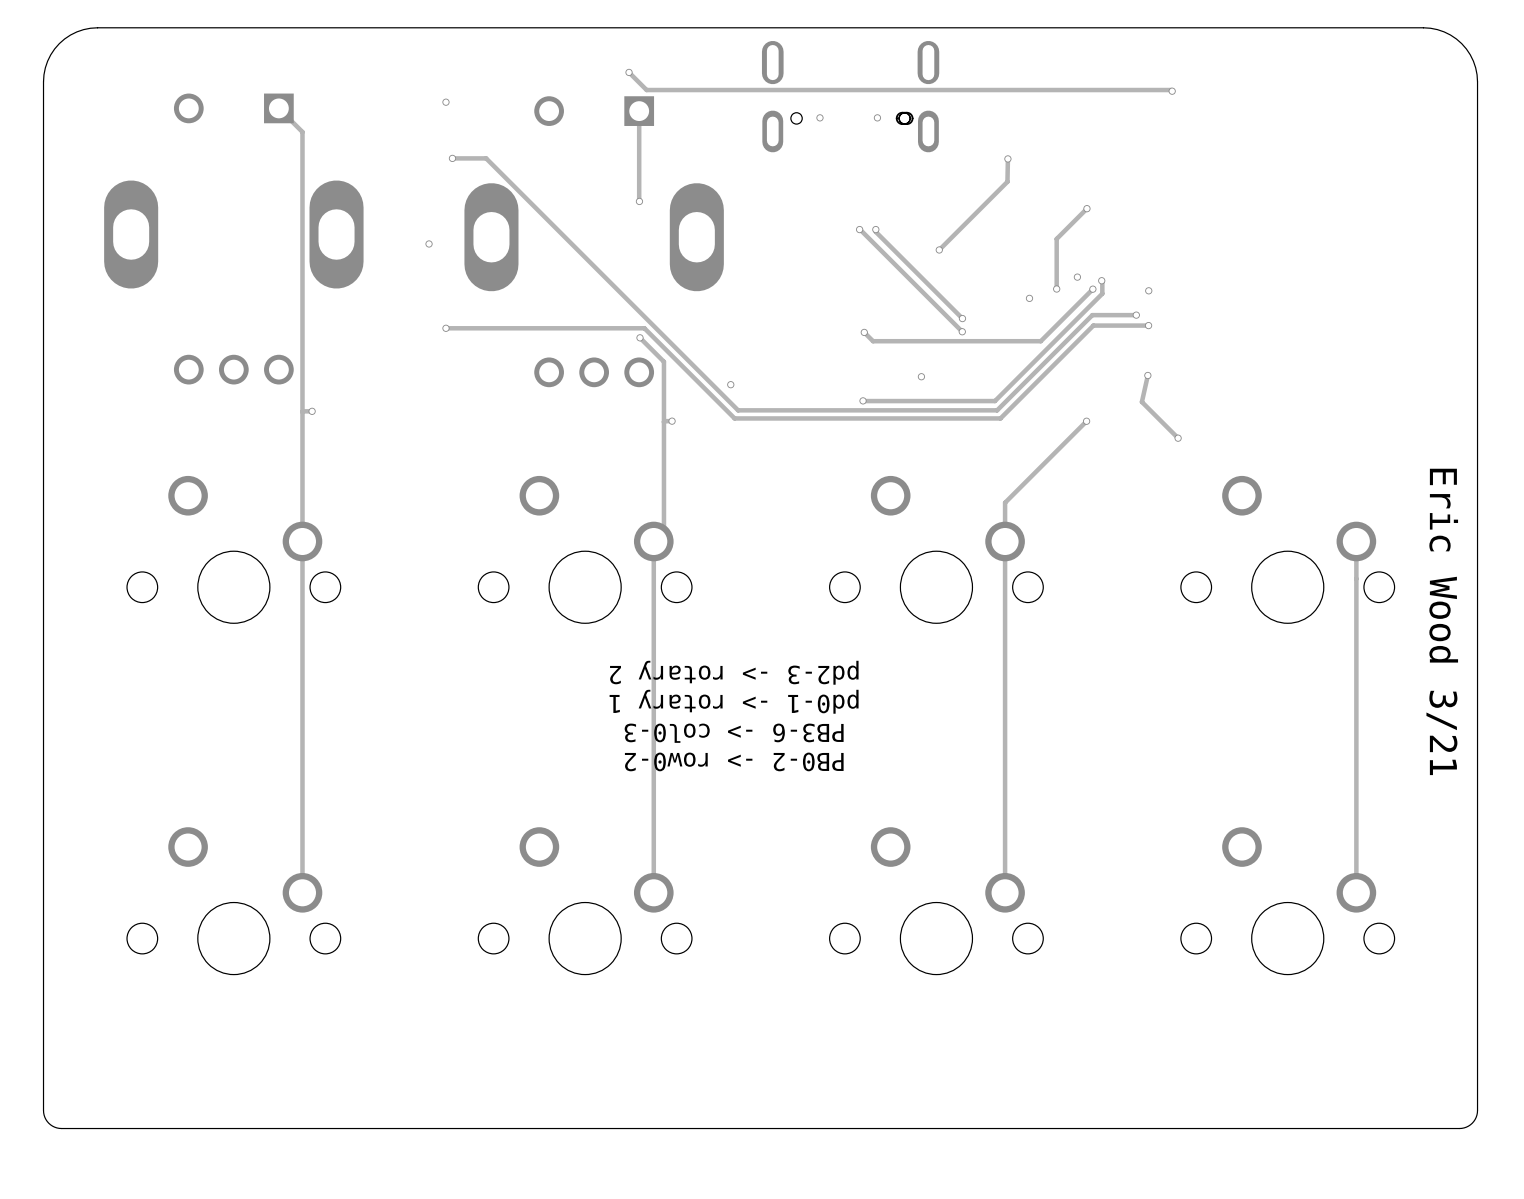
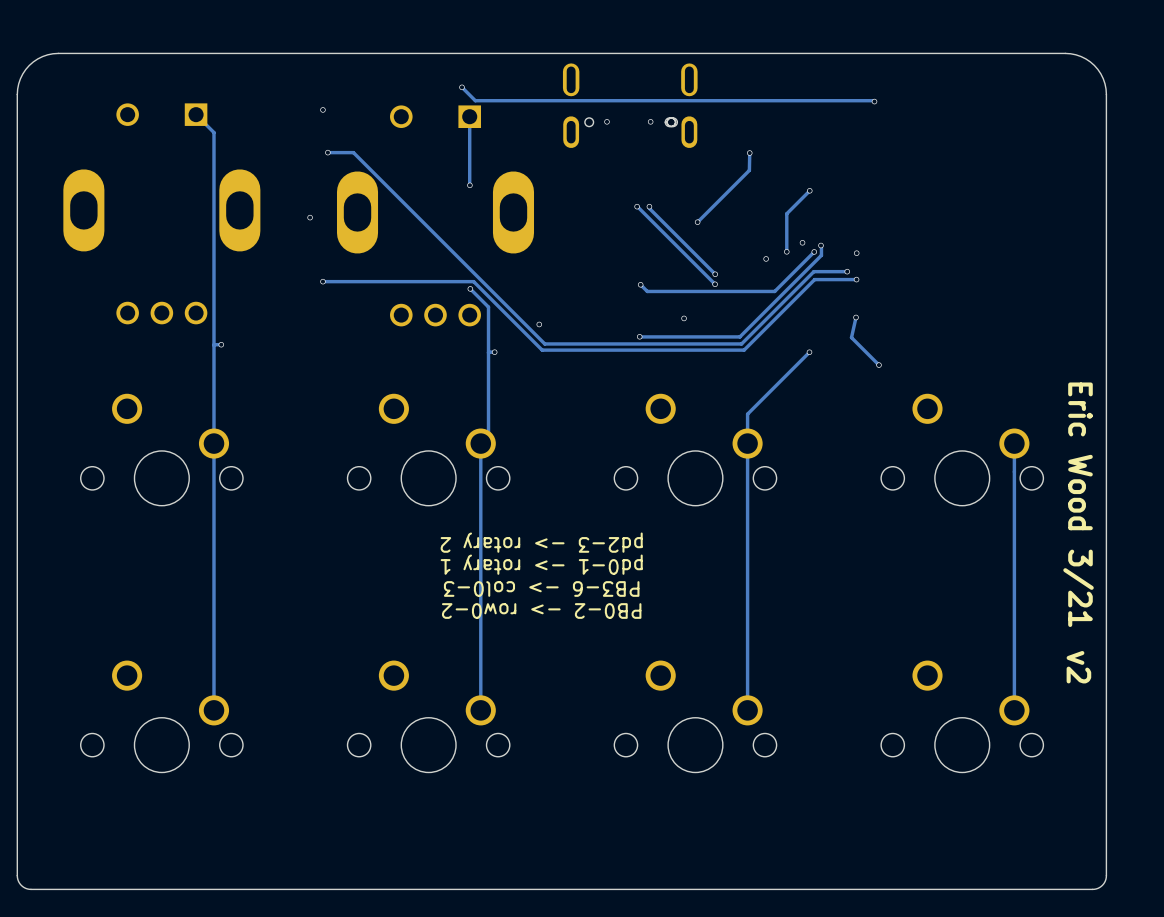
text: none -> v2 (1078, 667)

